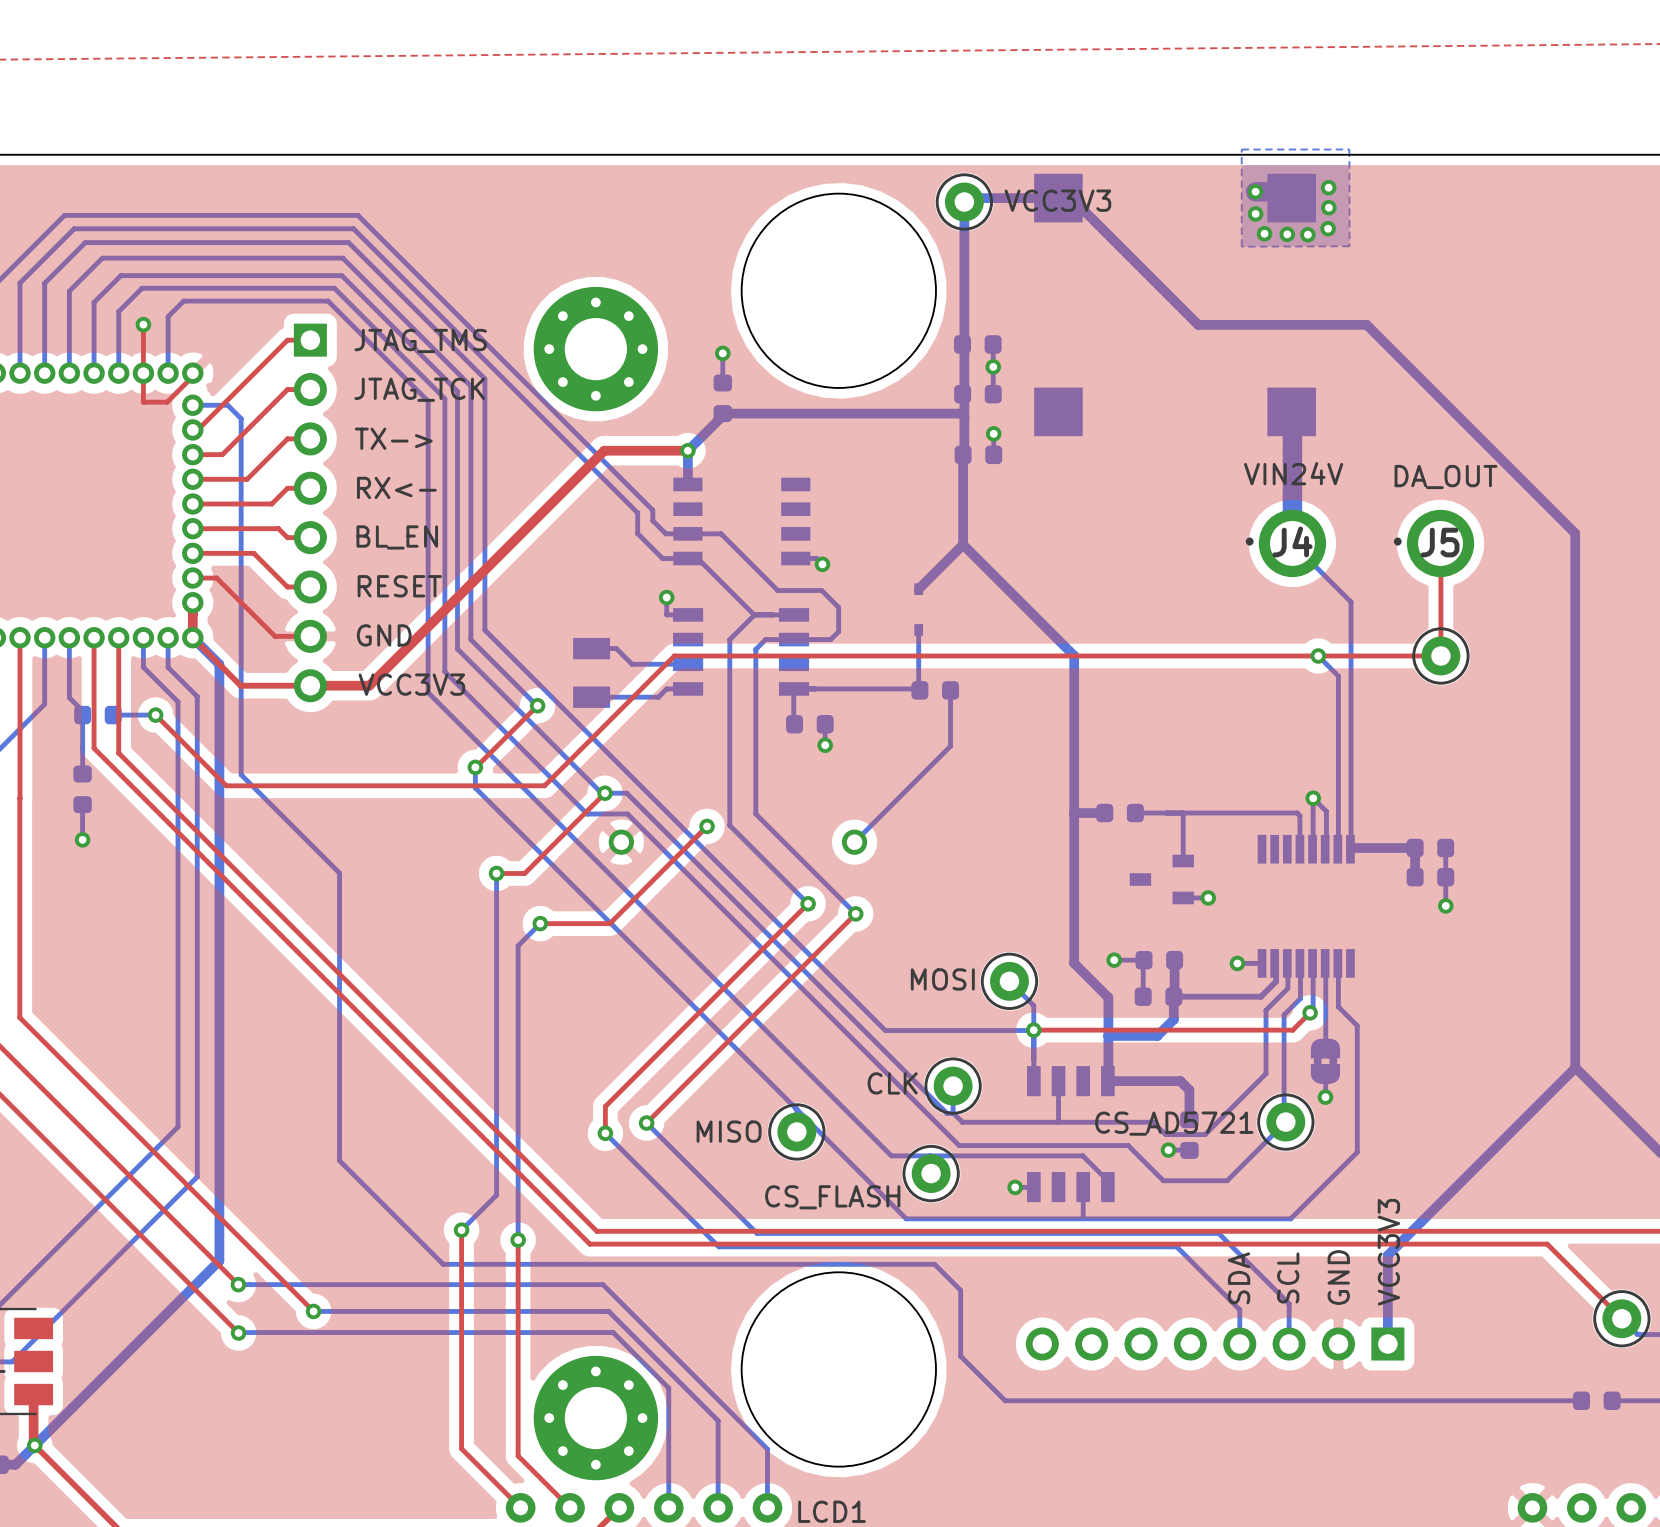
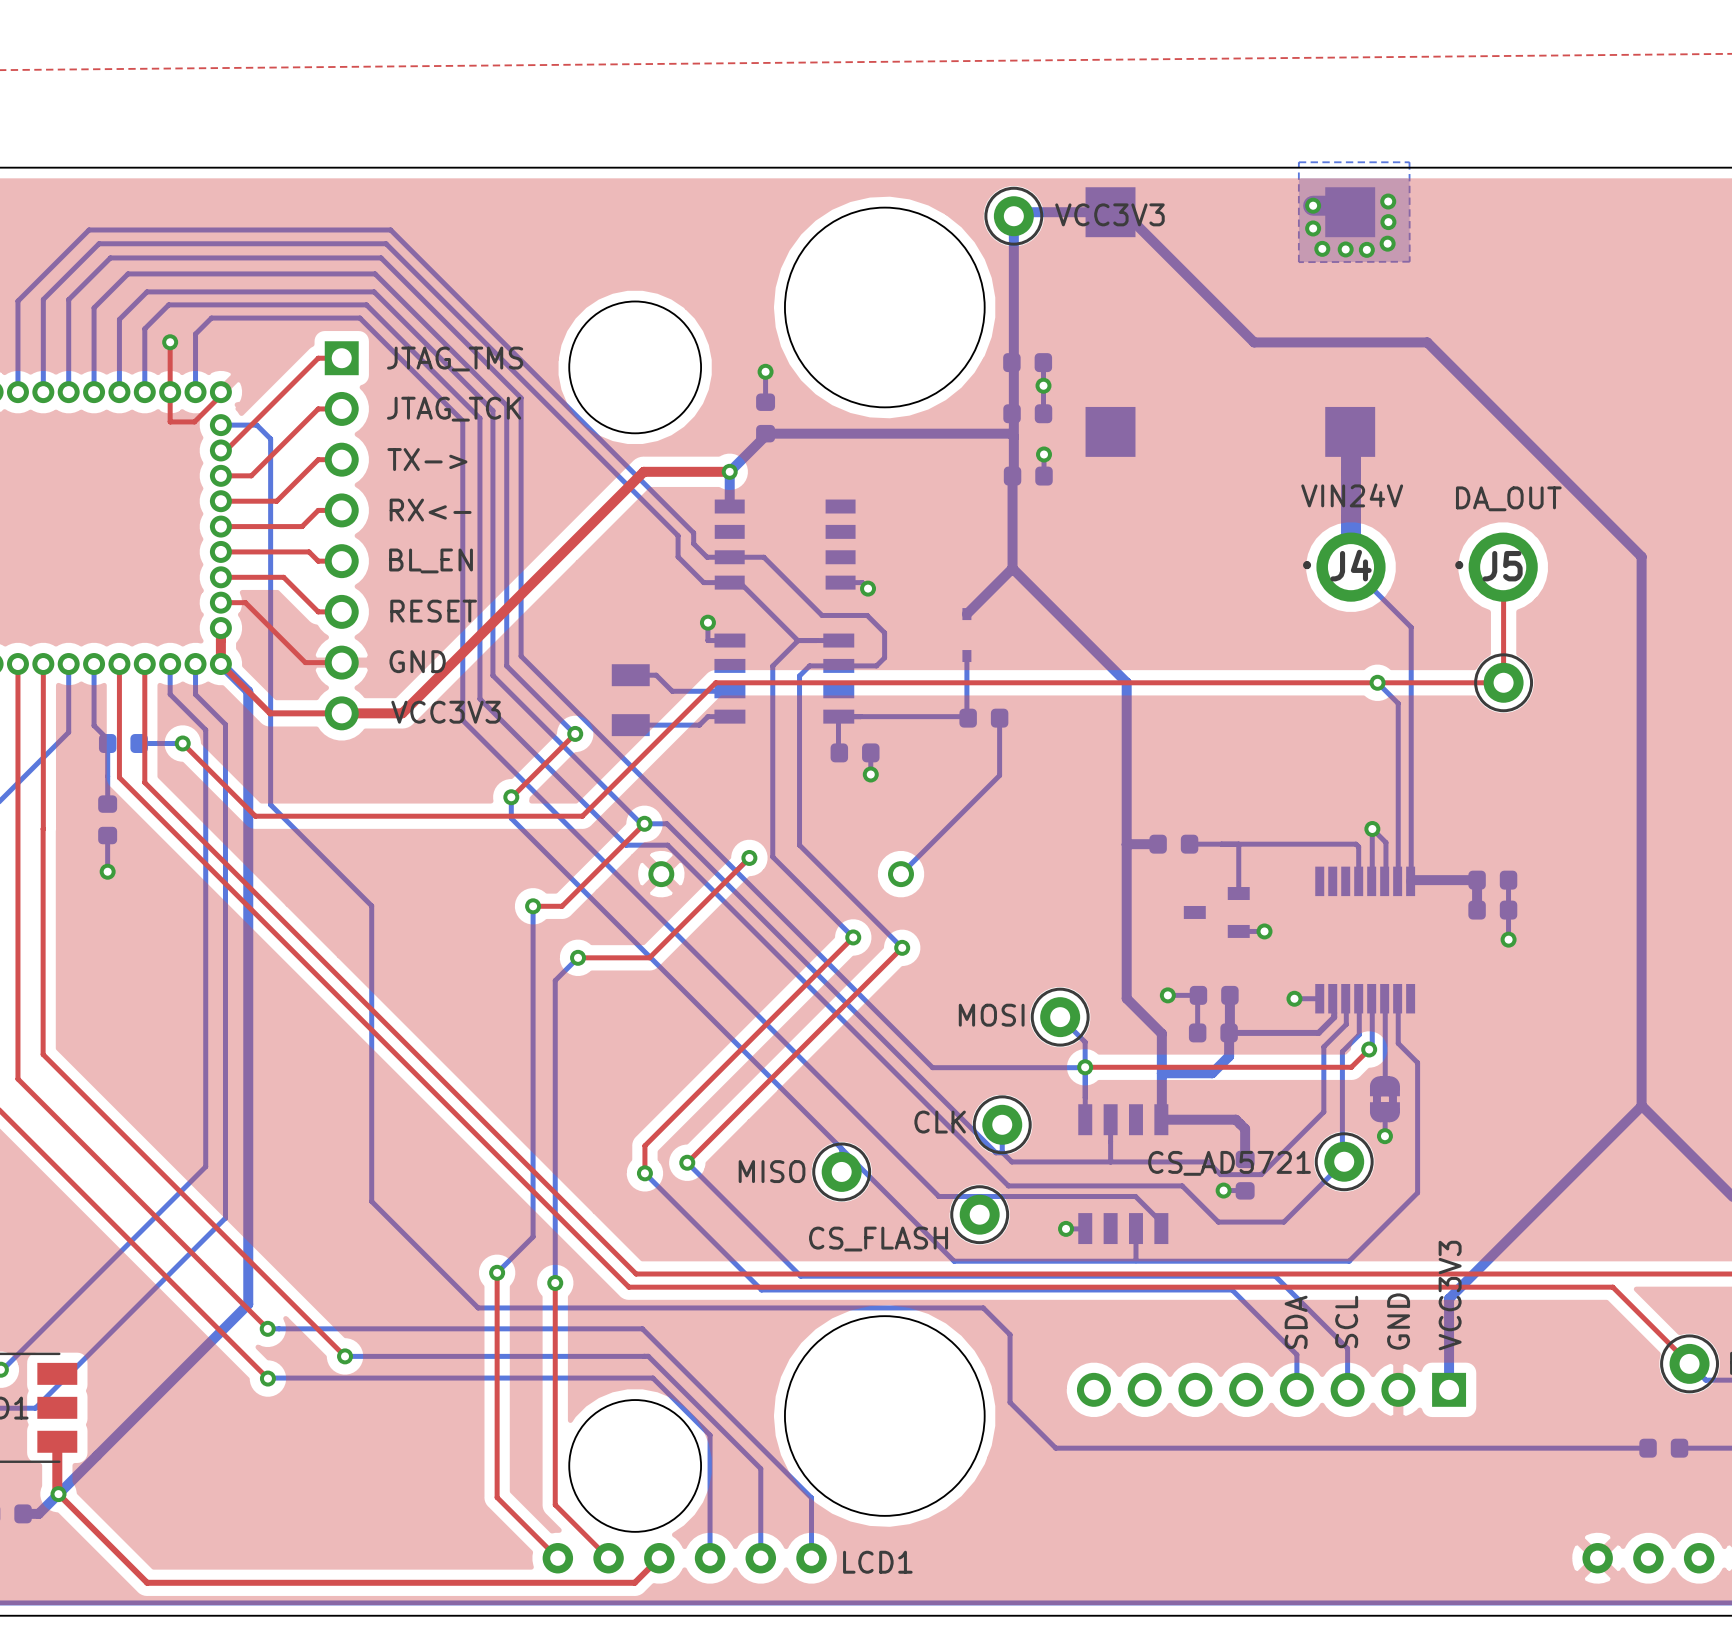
round board edge: none -> [568, 300, 702, 434]
part: (595, 349) -> none
round board edge: none -> [568, 1399, 702, 1533]
part: (595, 1418) -> none

